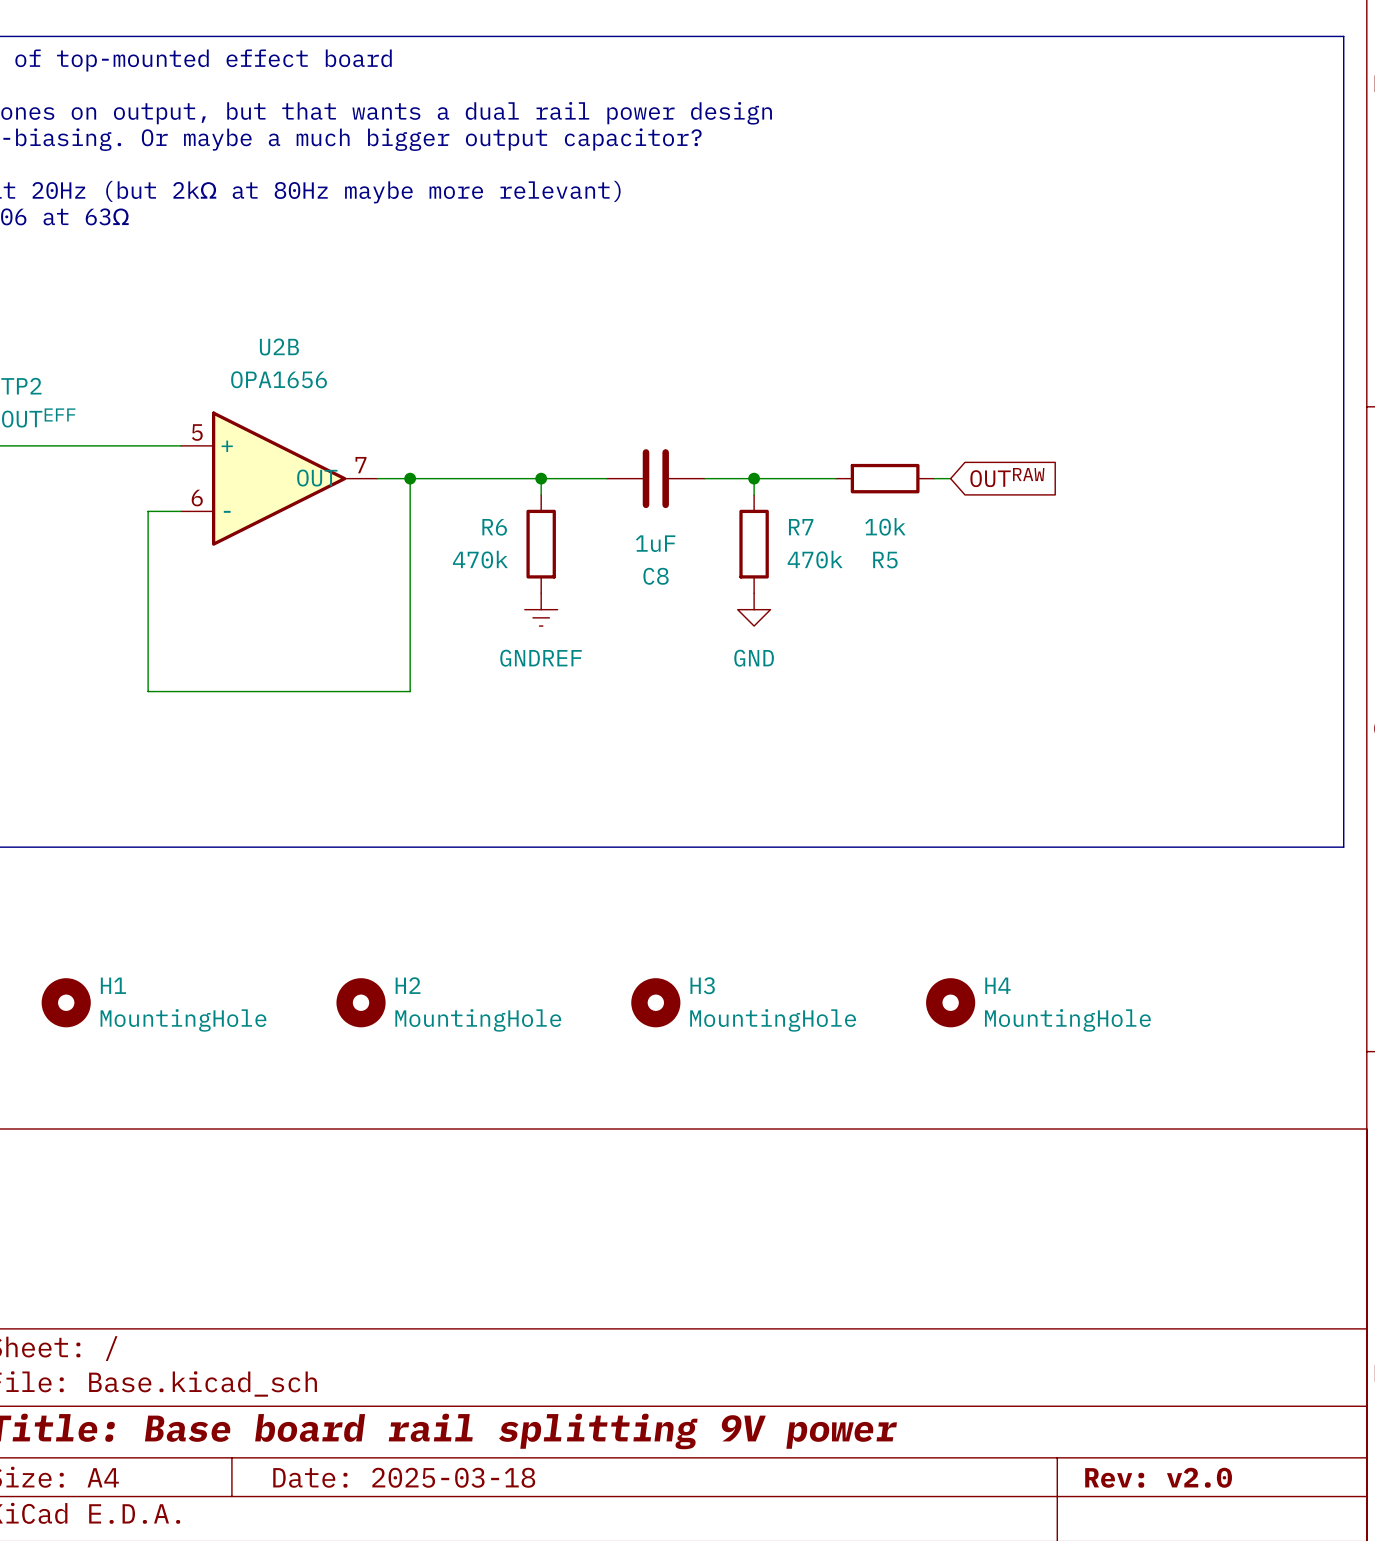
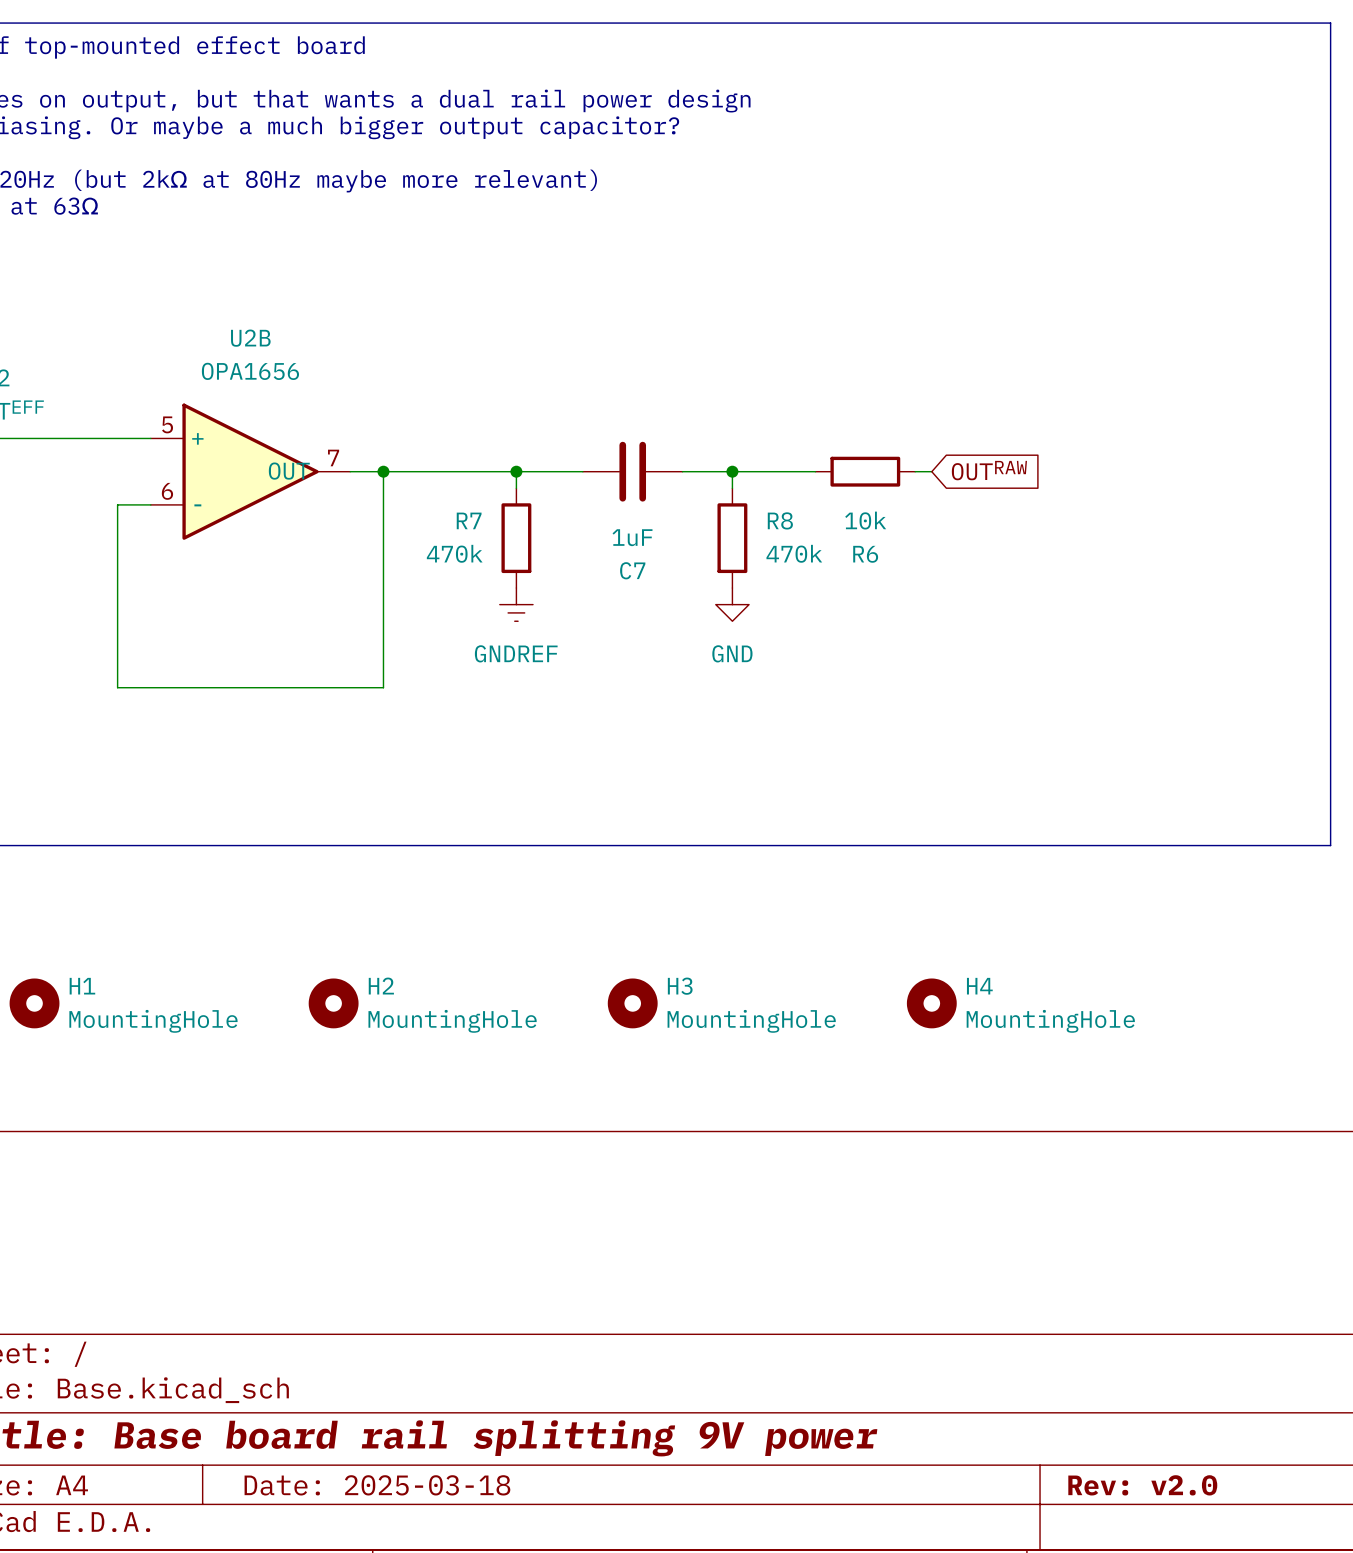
R6 name: R6 (494, 527) -> R7 (469, 520)
R7 name: R7 (801, 527) -> R8 (780, 520)
R5 name: R5 (885, 560) -> R6 (865, 554)
C8 name: C8 (656, 576) -> C7 (632, 570)

